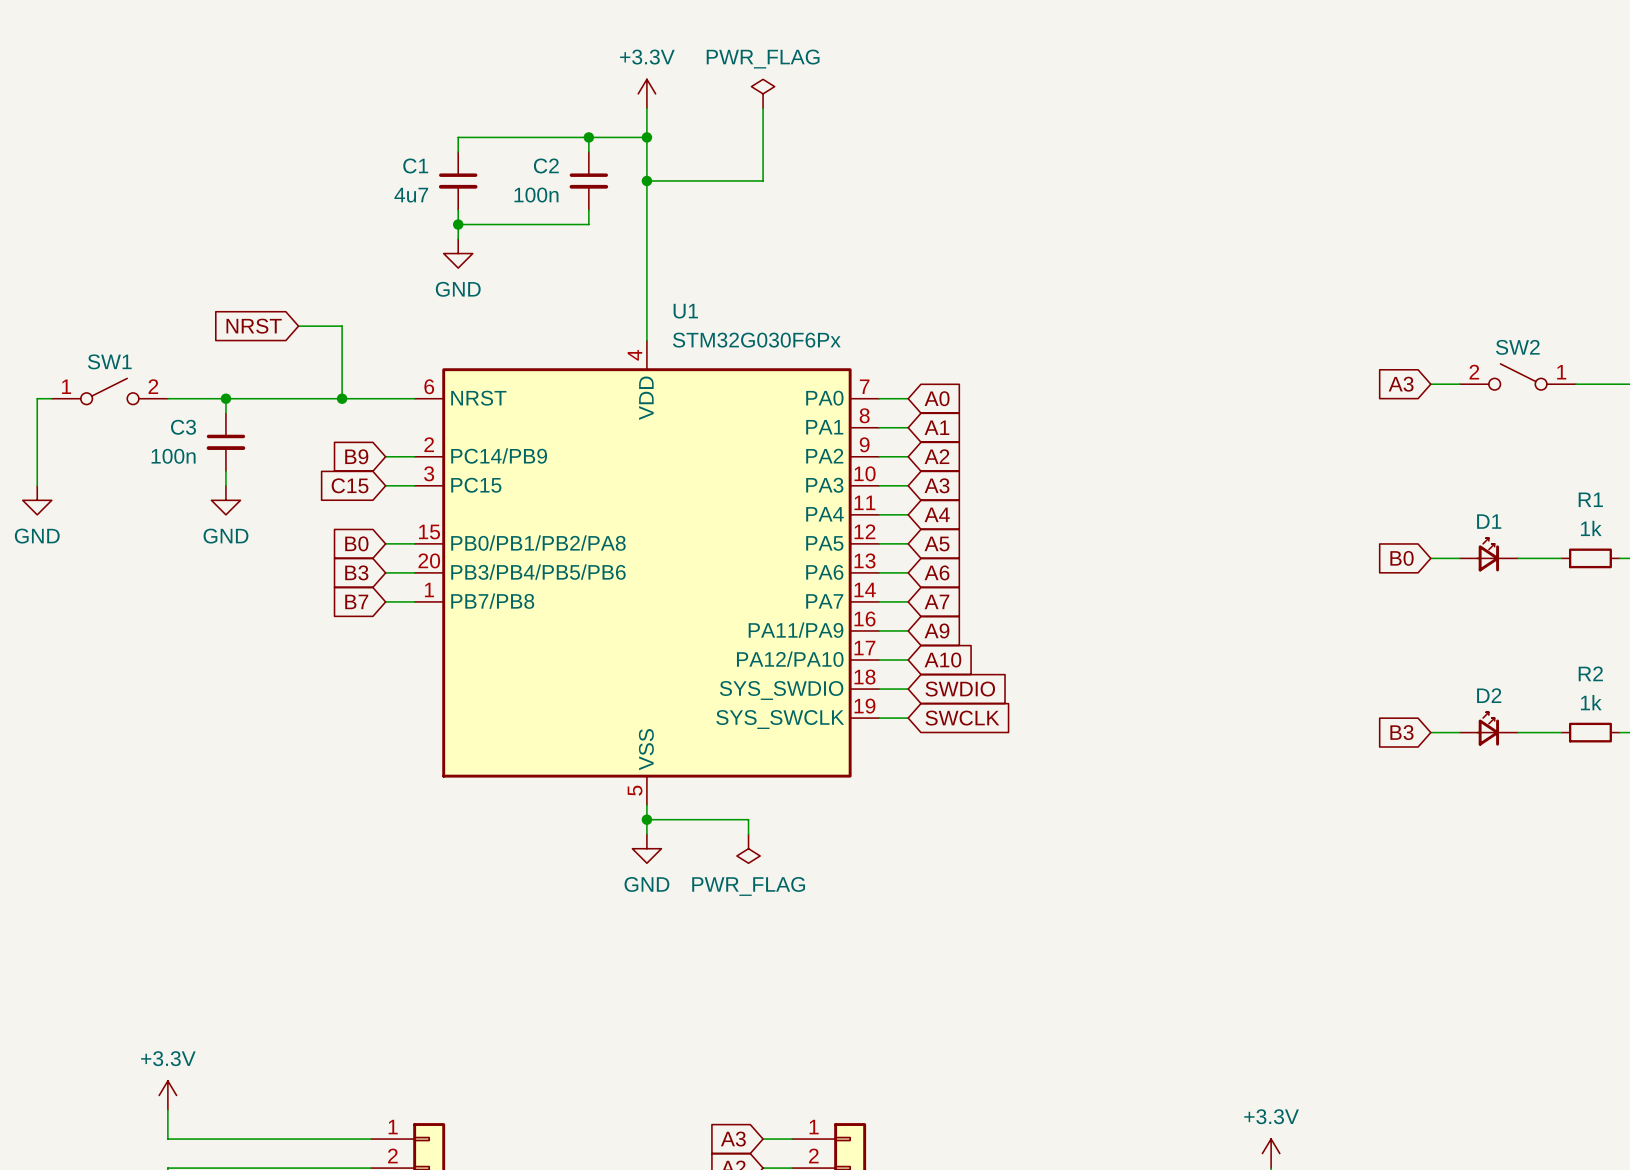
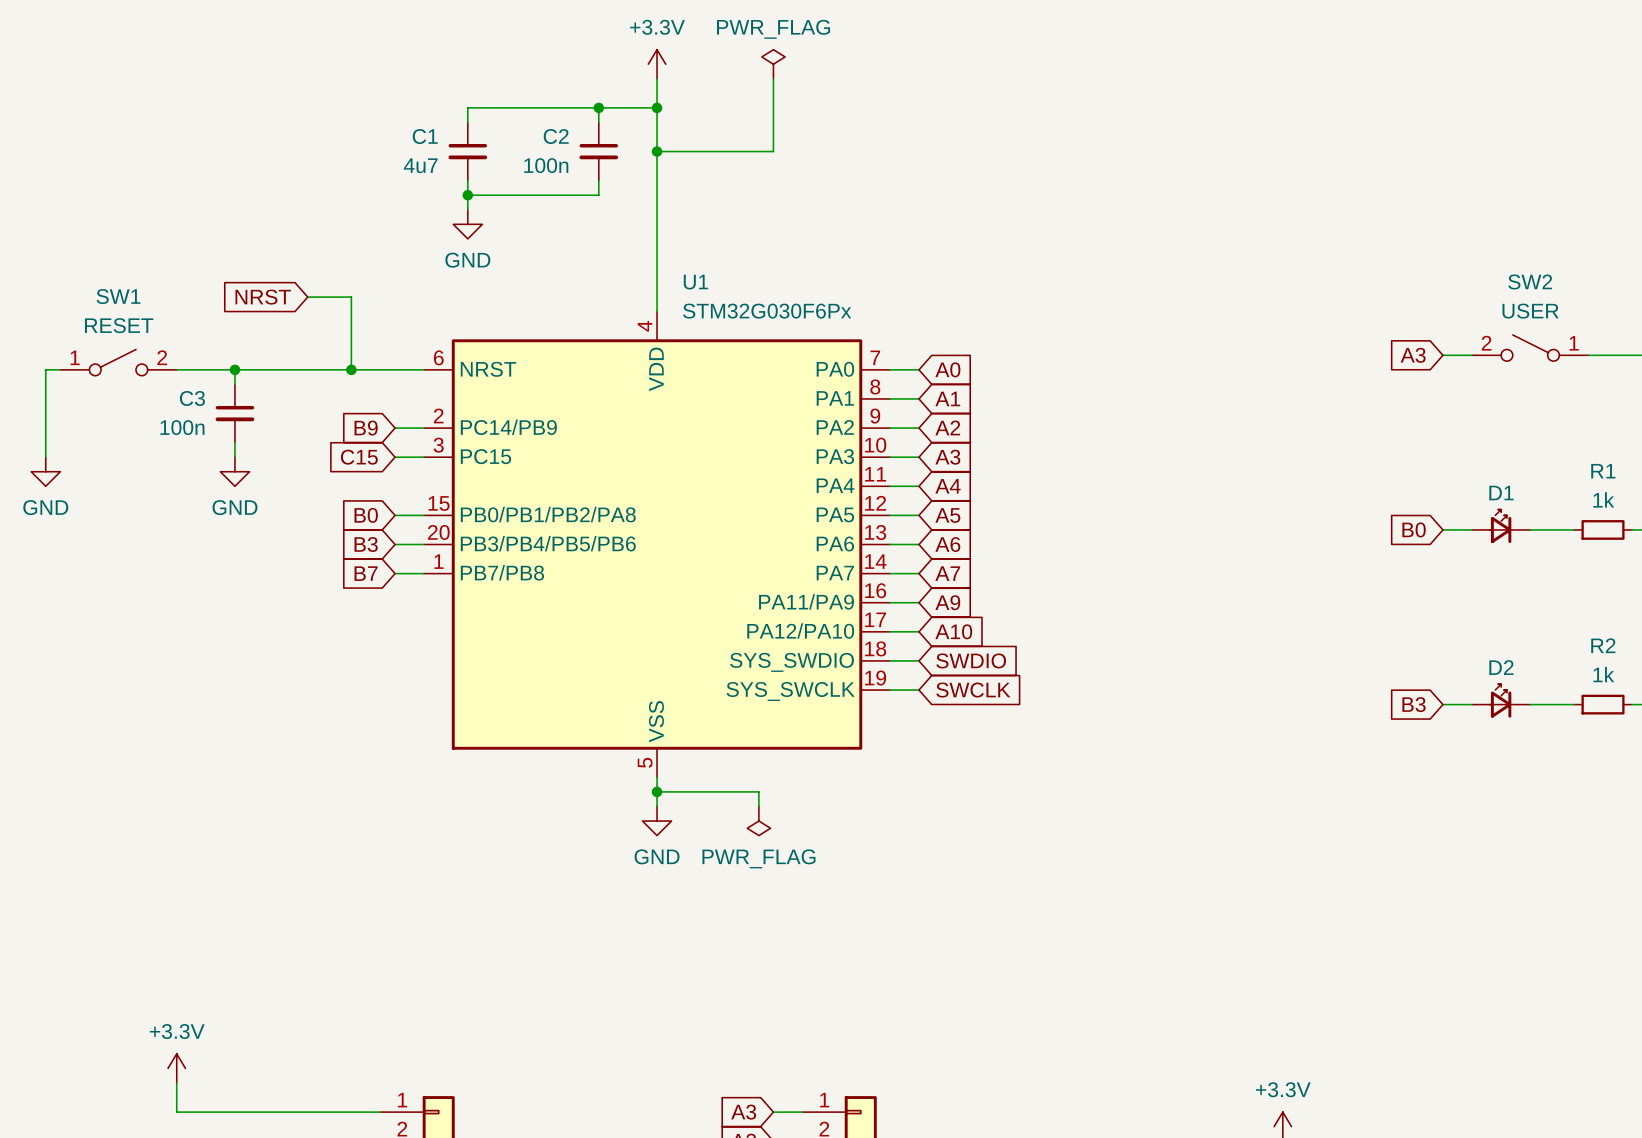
SW2 value: none -> USER (1530, 311)
SW2 name position: SW2 (1517, 347) -> SW2 (1530, 281)
SW1 value: none -> RESET (119, 325)
SW1 name position: SW1 (109, 361) -> SW1 (118, 296)

